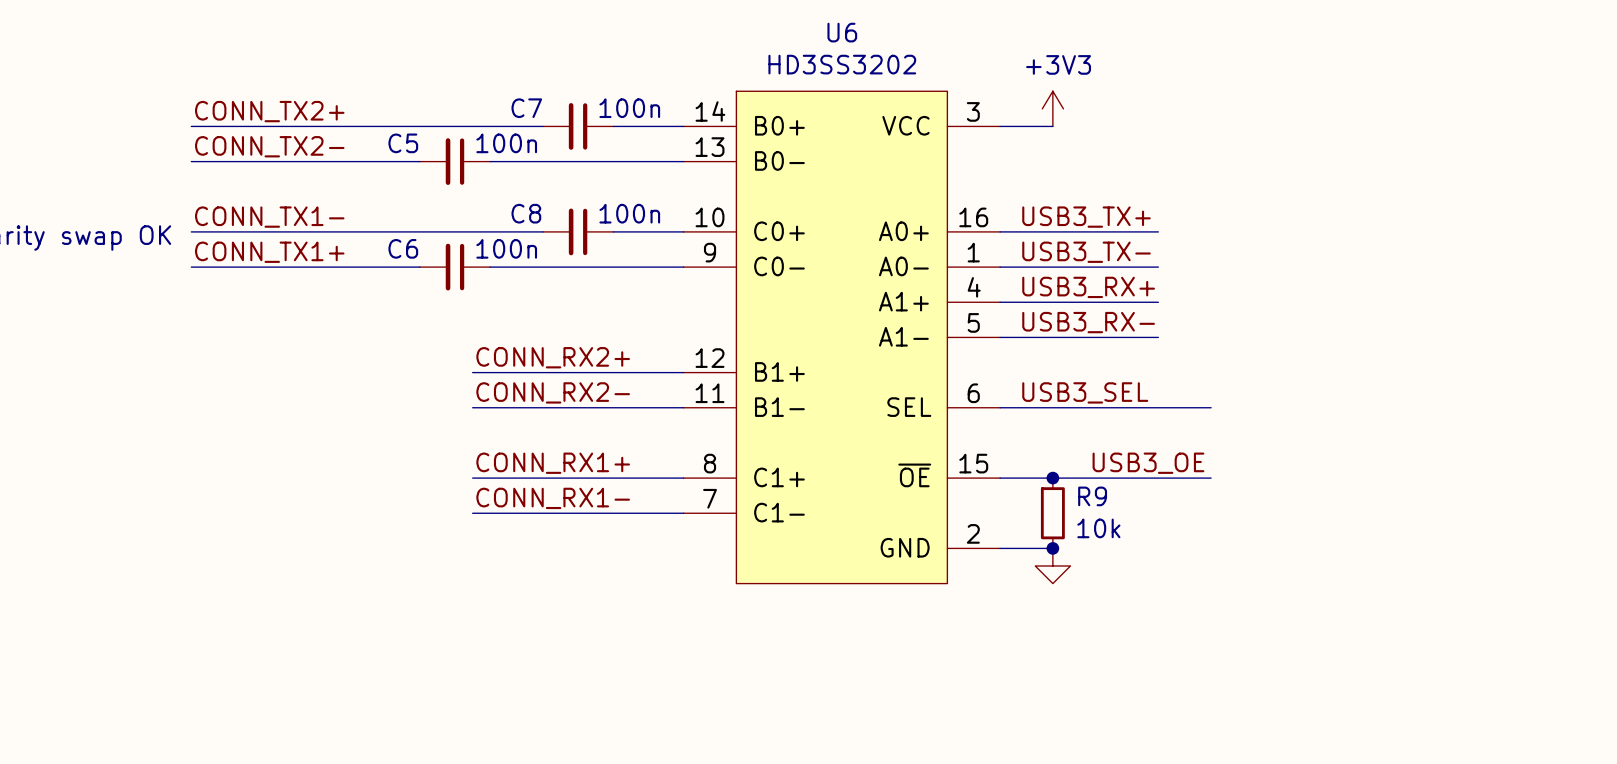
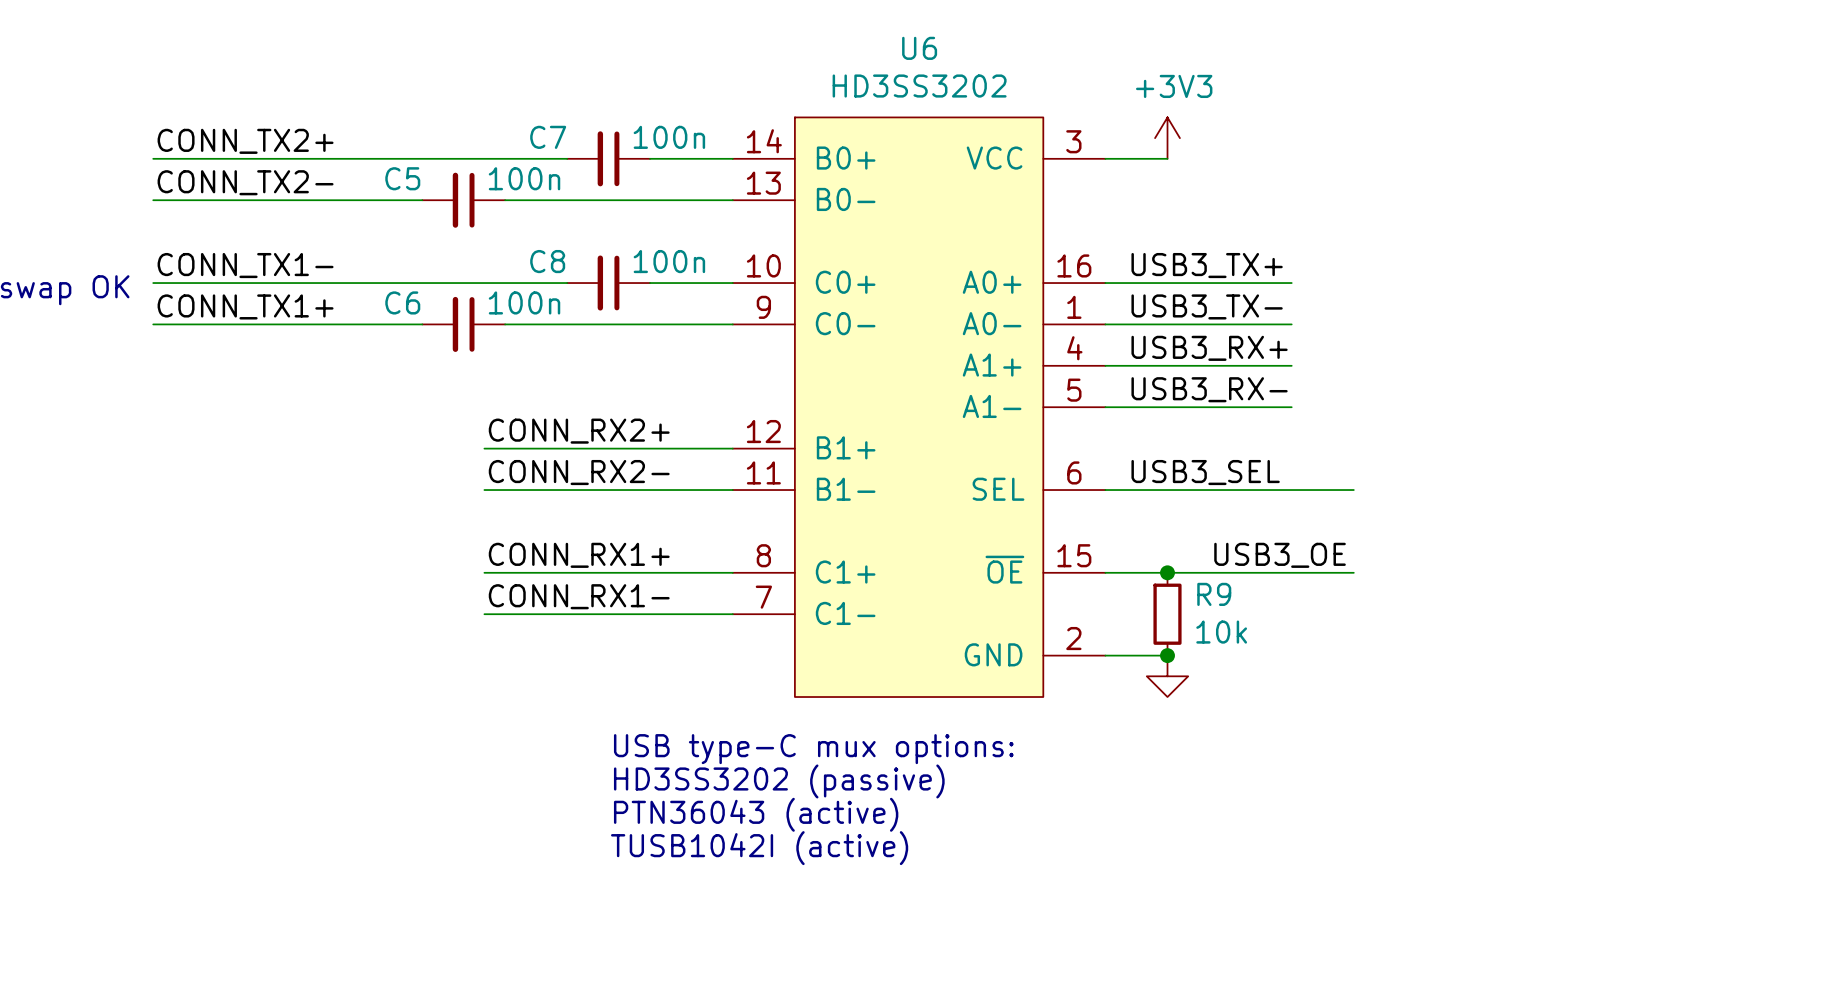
text: none -> USB type-C mux options: (813, 749)
text: none -> HD3SS3202 (passive) (779, 781)
text: none -> PTN36043 (active) (756, 814)
text: none -> TUSB1042I (active) (759, 848)

